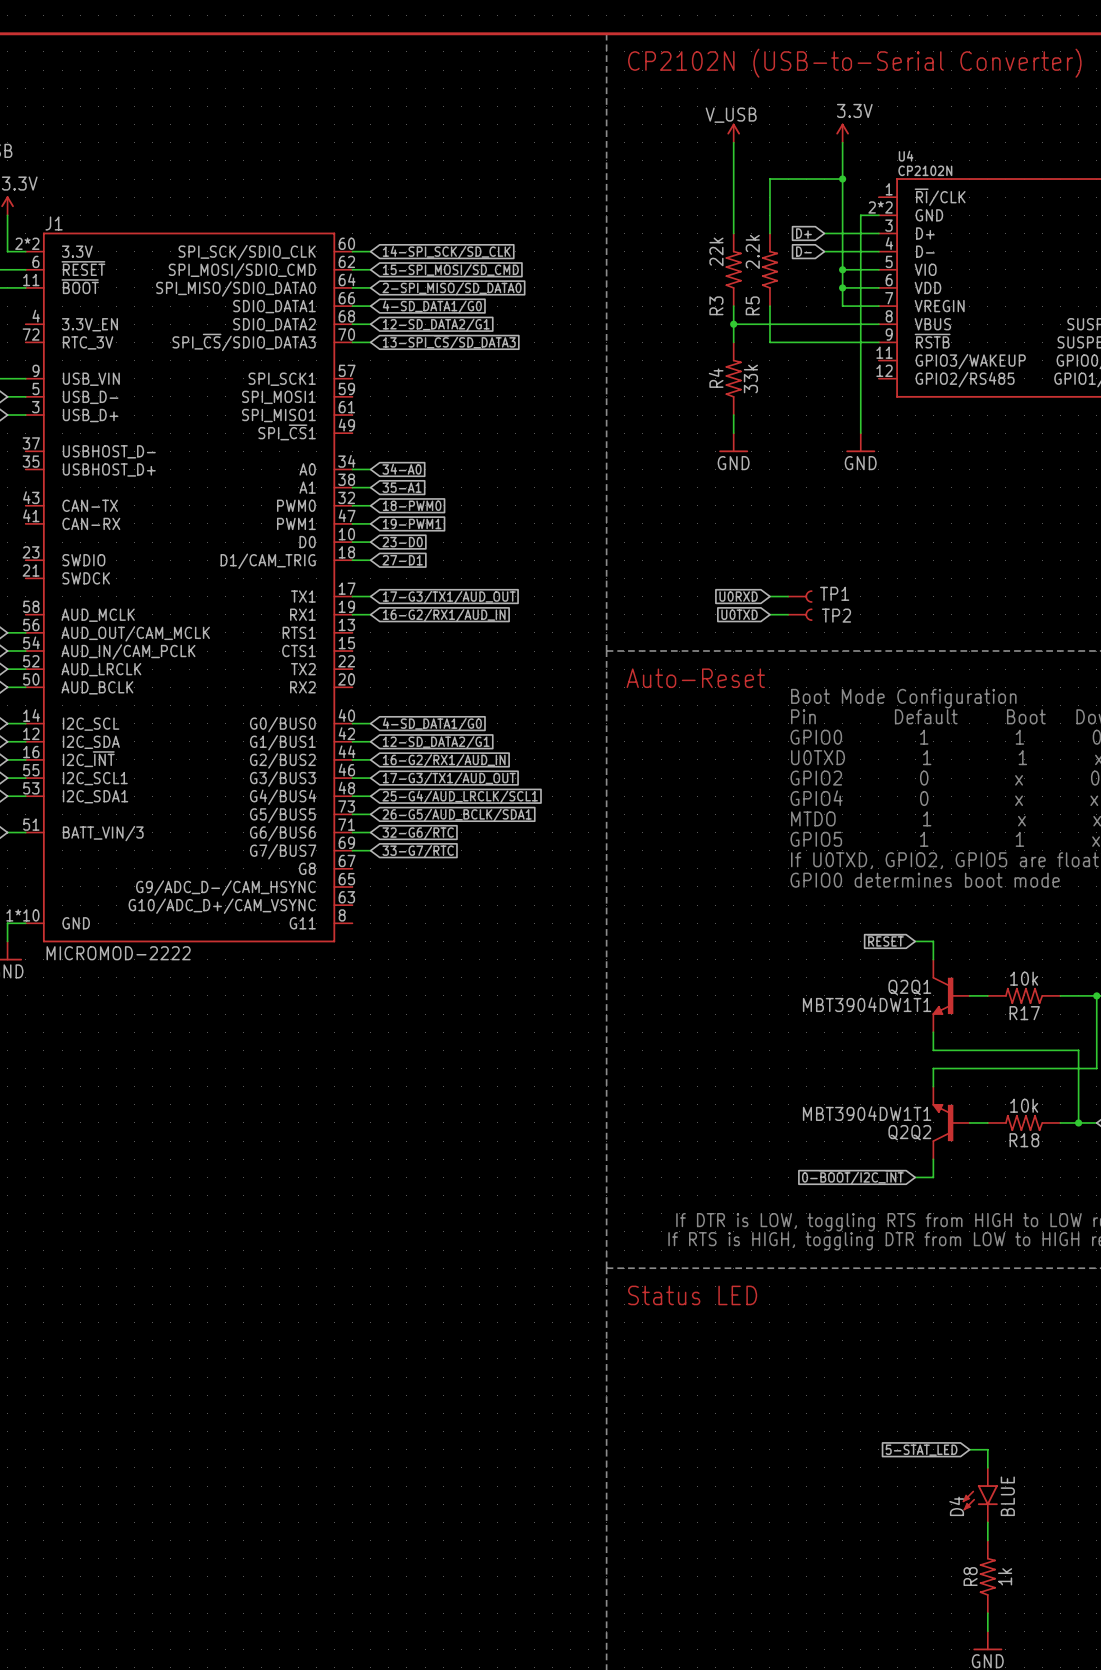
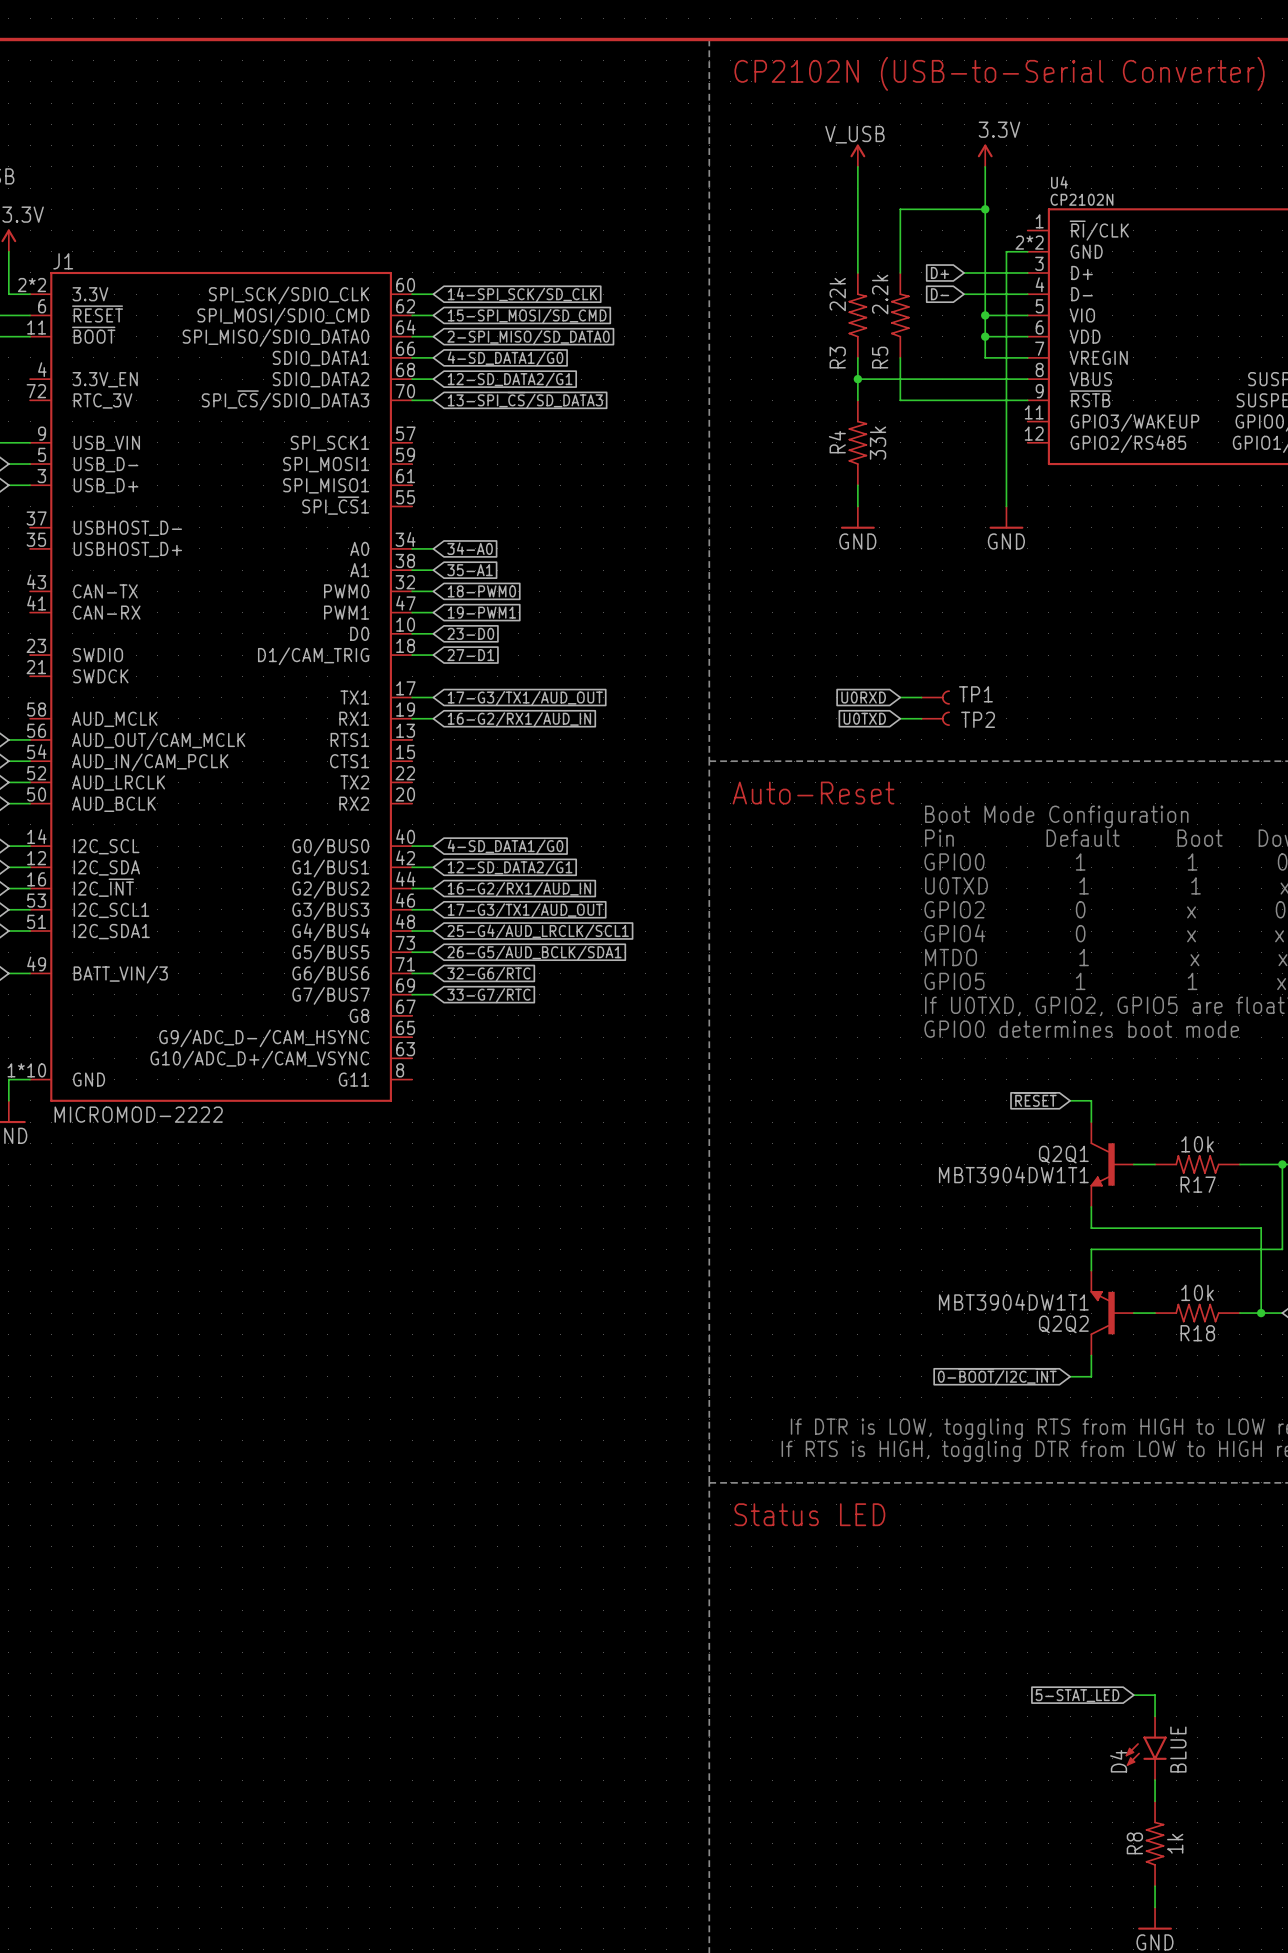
J1 pin number: 49 (346, 425) -> 55 (405, 497)
J1 pin number: 55 (31, 770) -> 53 (36, 900)
J1 pin number: 53 (31, 788) -> 51 (36, 921)
J1 pin number: 51 (31, 824) -> 49 (36, 963)

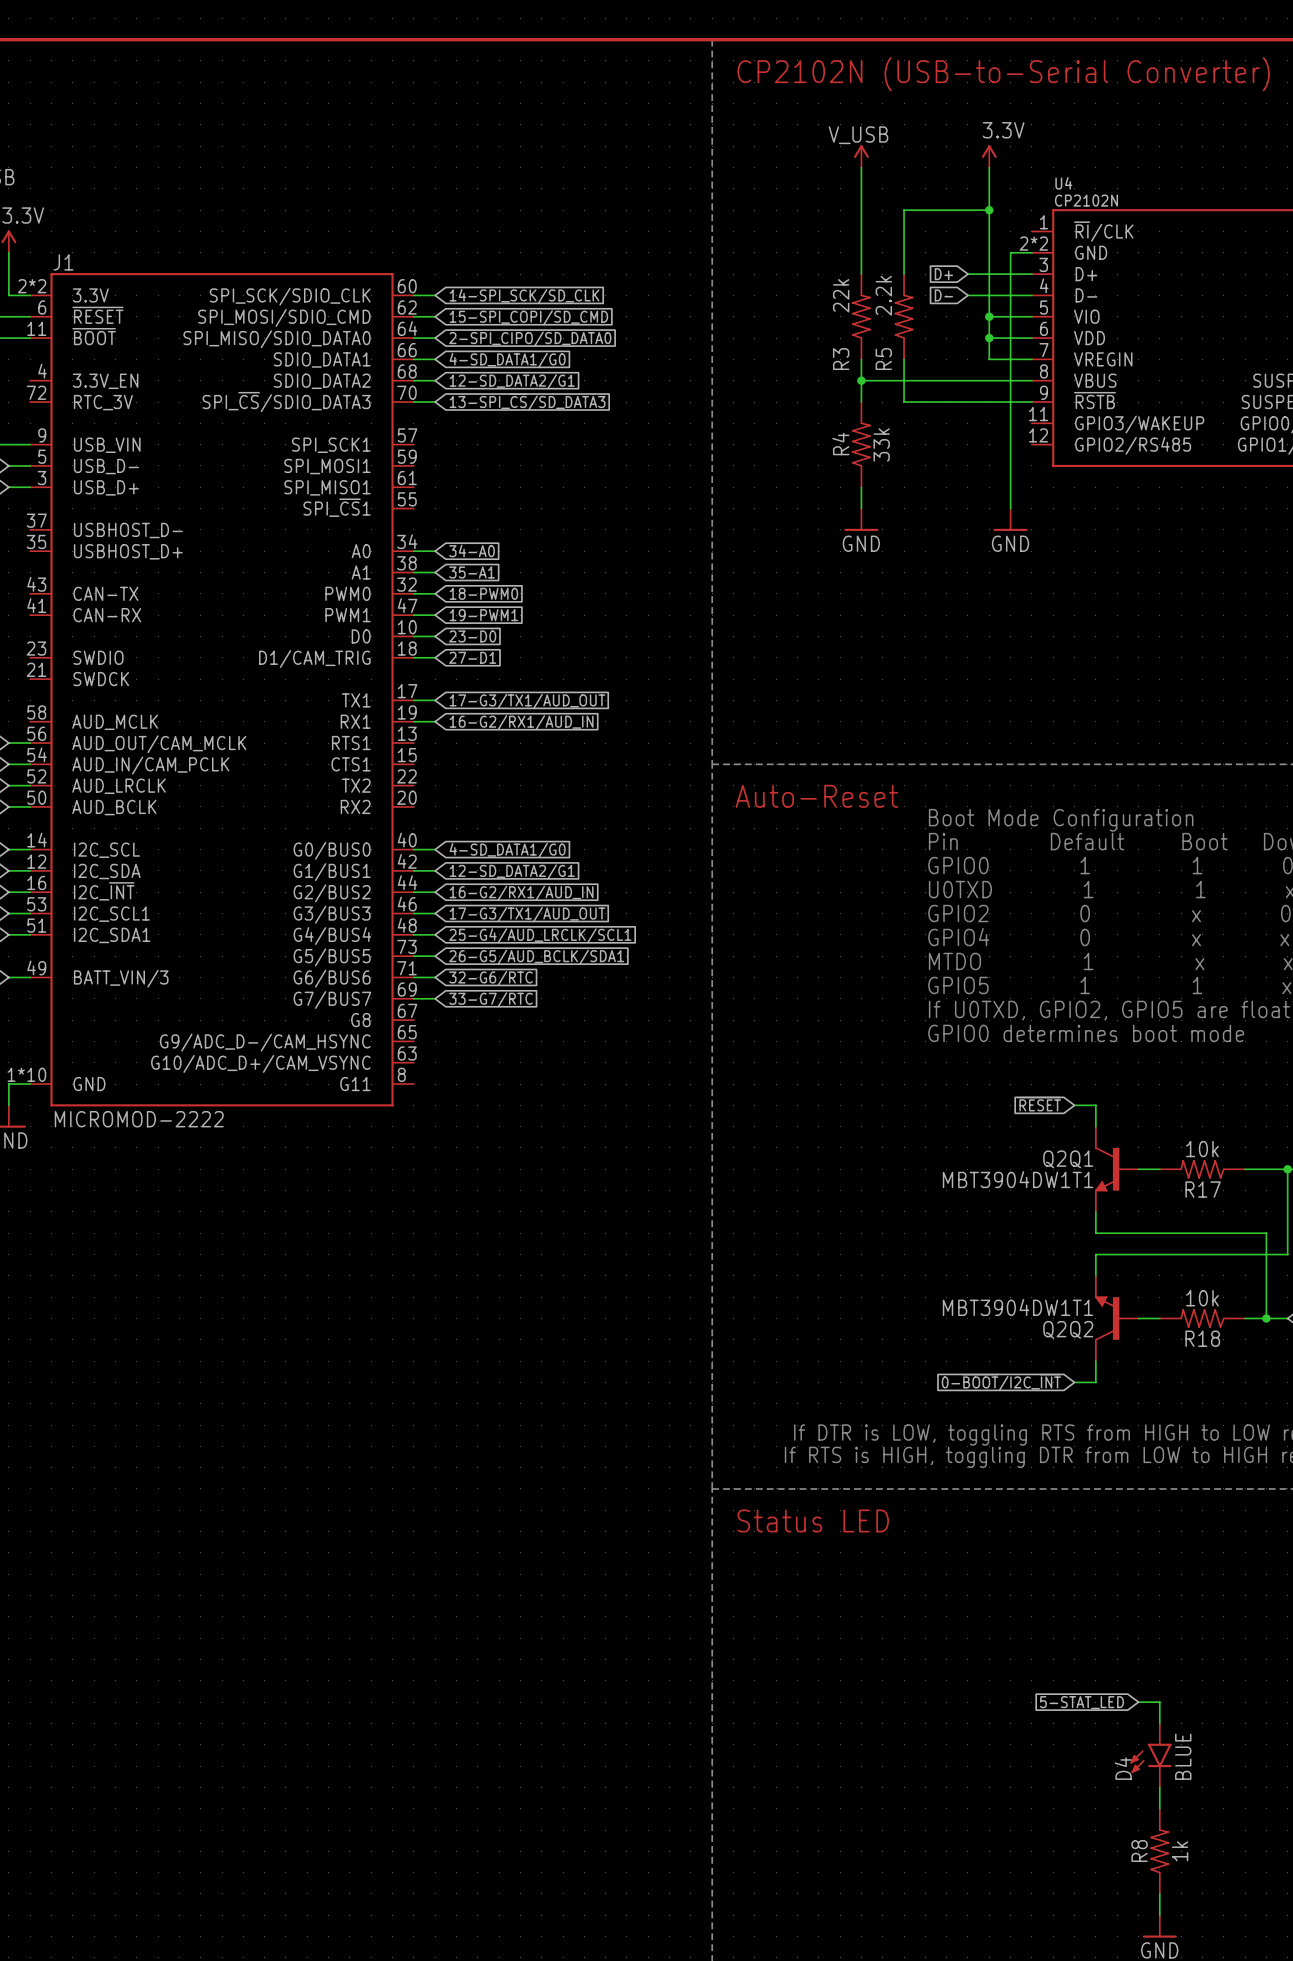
global label: 15-SPI_MOSI/SD_CMD (527, 316) -> 15-SPI_COPI/SD_CMD (528, 317)
global label: 2-SPI_MISO/SD_DATA0 (528, 337) -> 2-SPI_CIPO/SD_DATA0 (530, 339)
global label: U0RXD (863, 697) -> none
wire: (900, 697) (921, 697) -> none
TP1: (935, 697) -> none
global label: U0TXD (864, 718) -> none
wire: (900, 718) (921, 718) -> none
TP2: (935, 718) -> none

